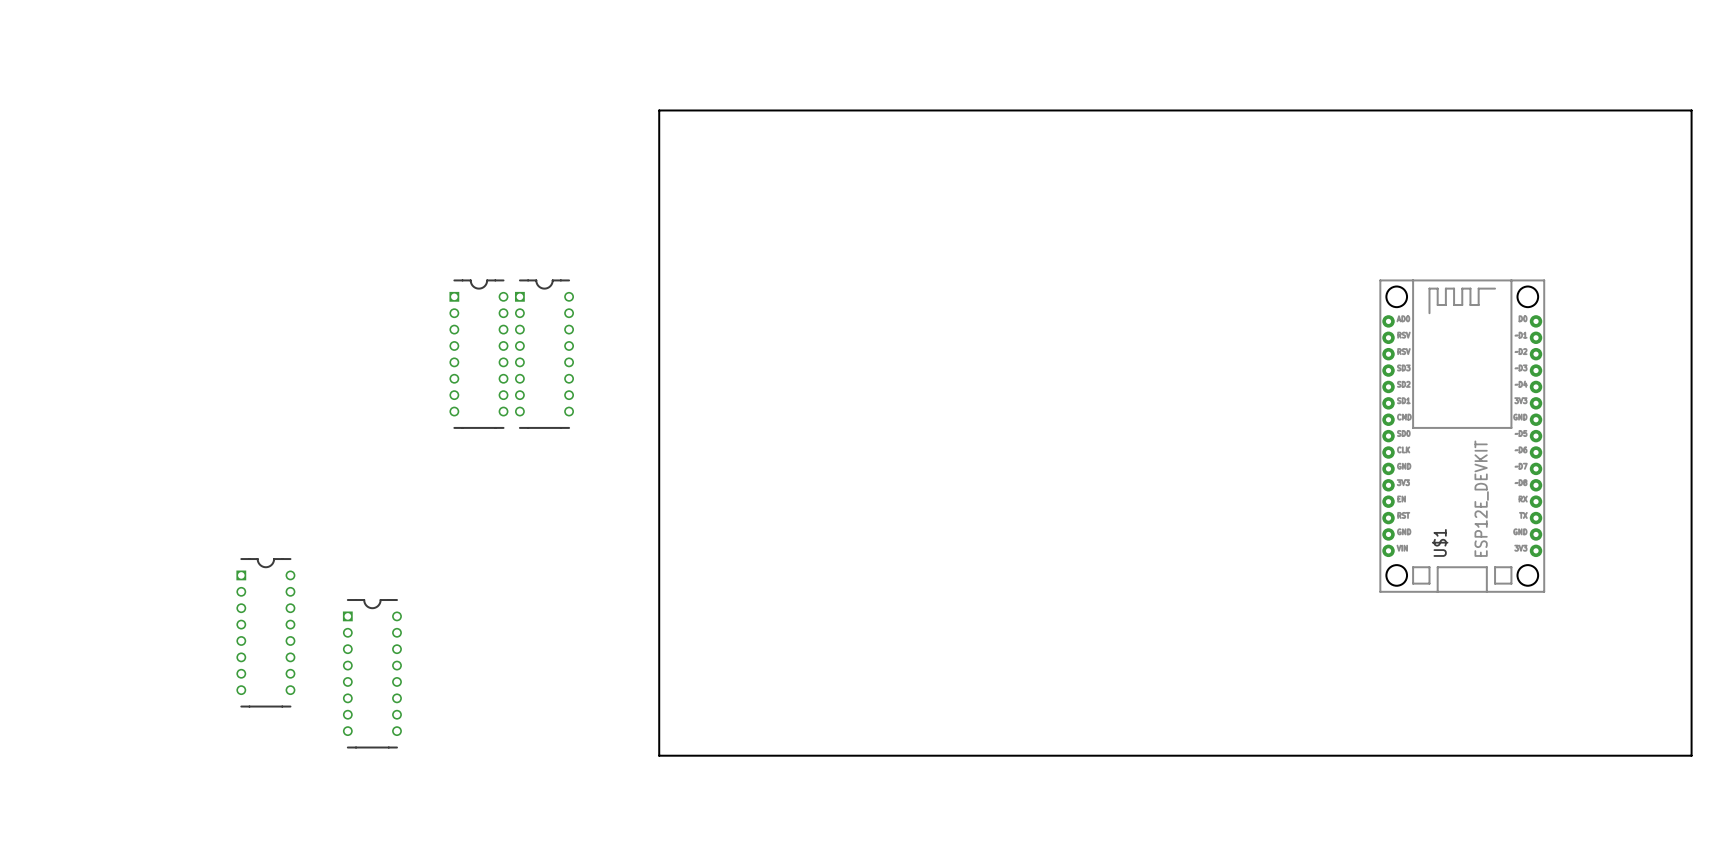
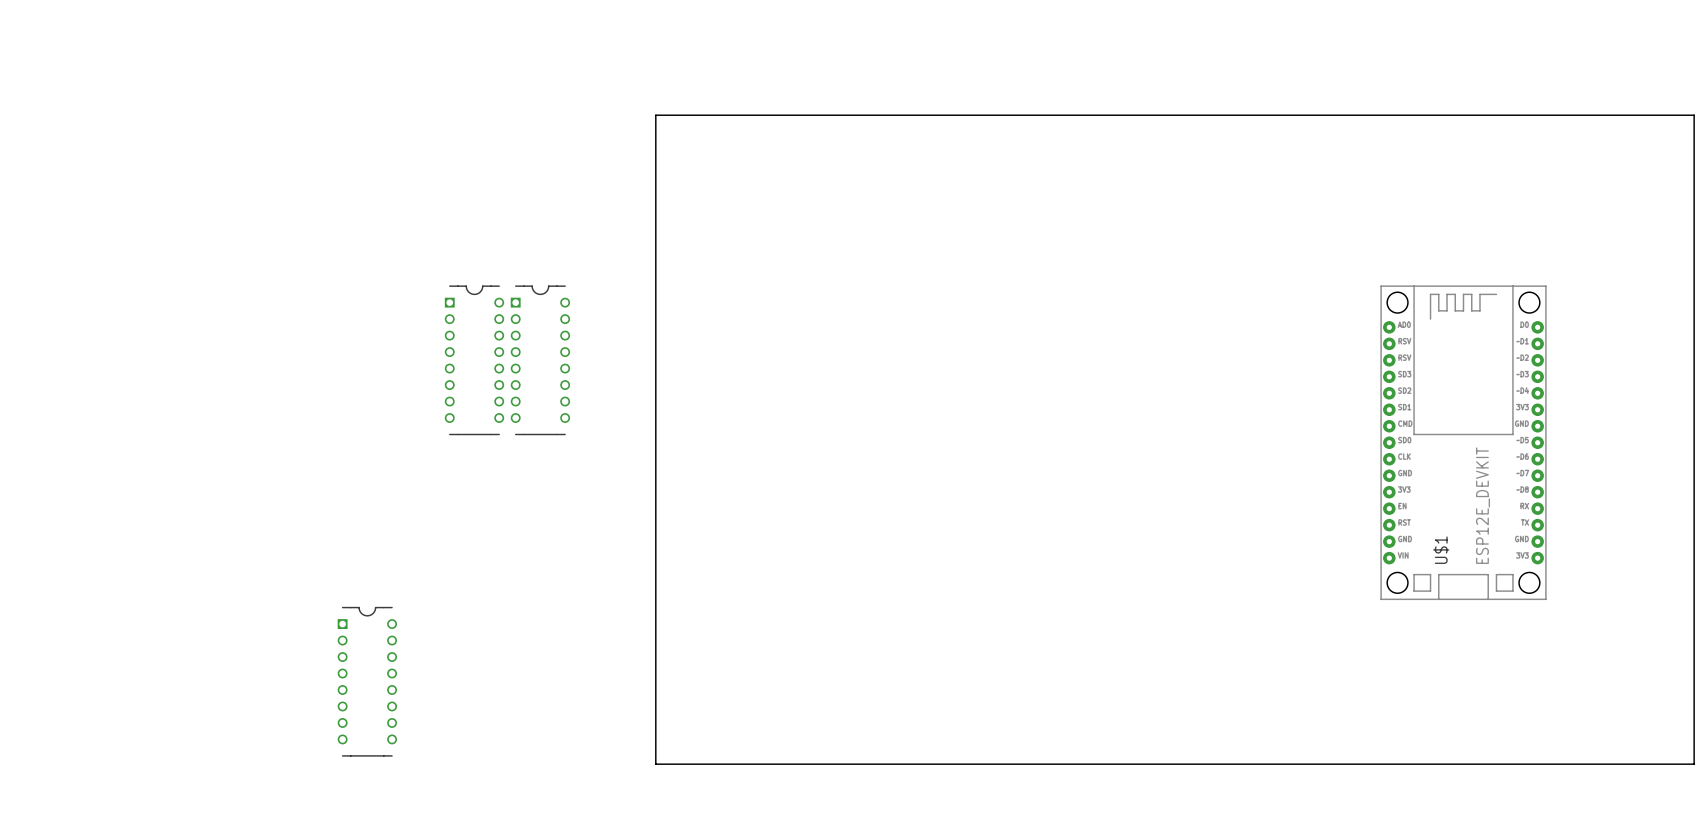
part: (265, 632) -> none

